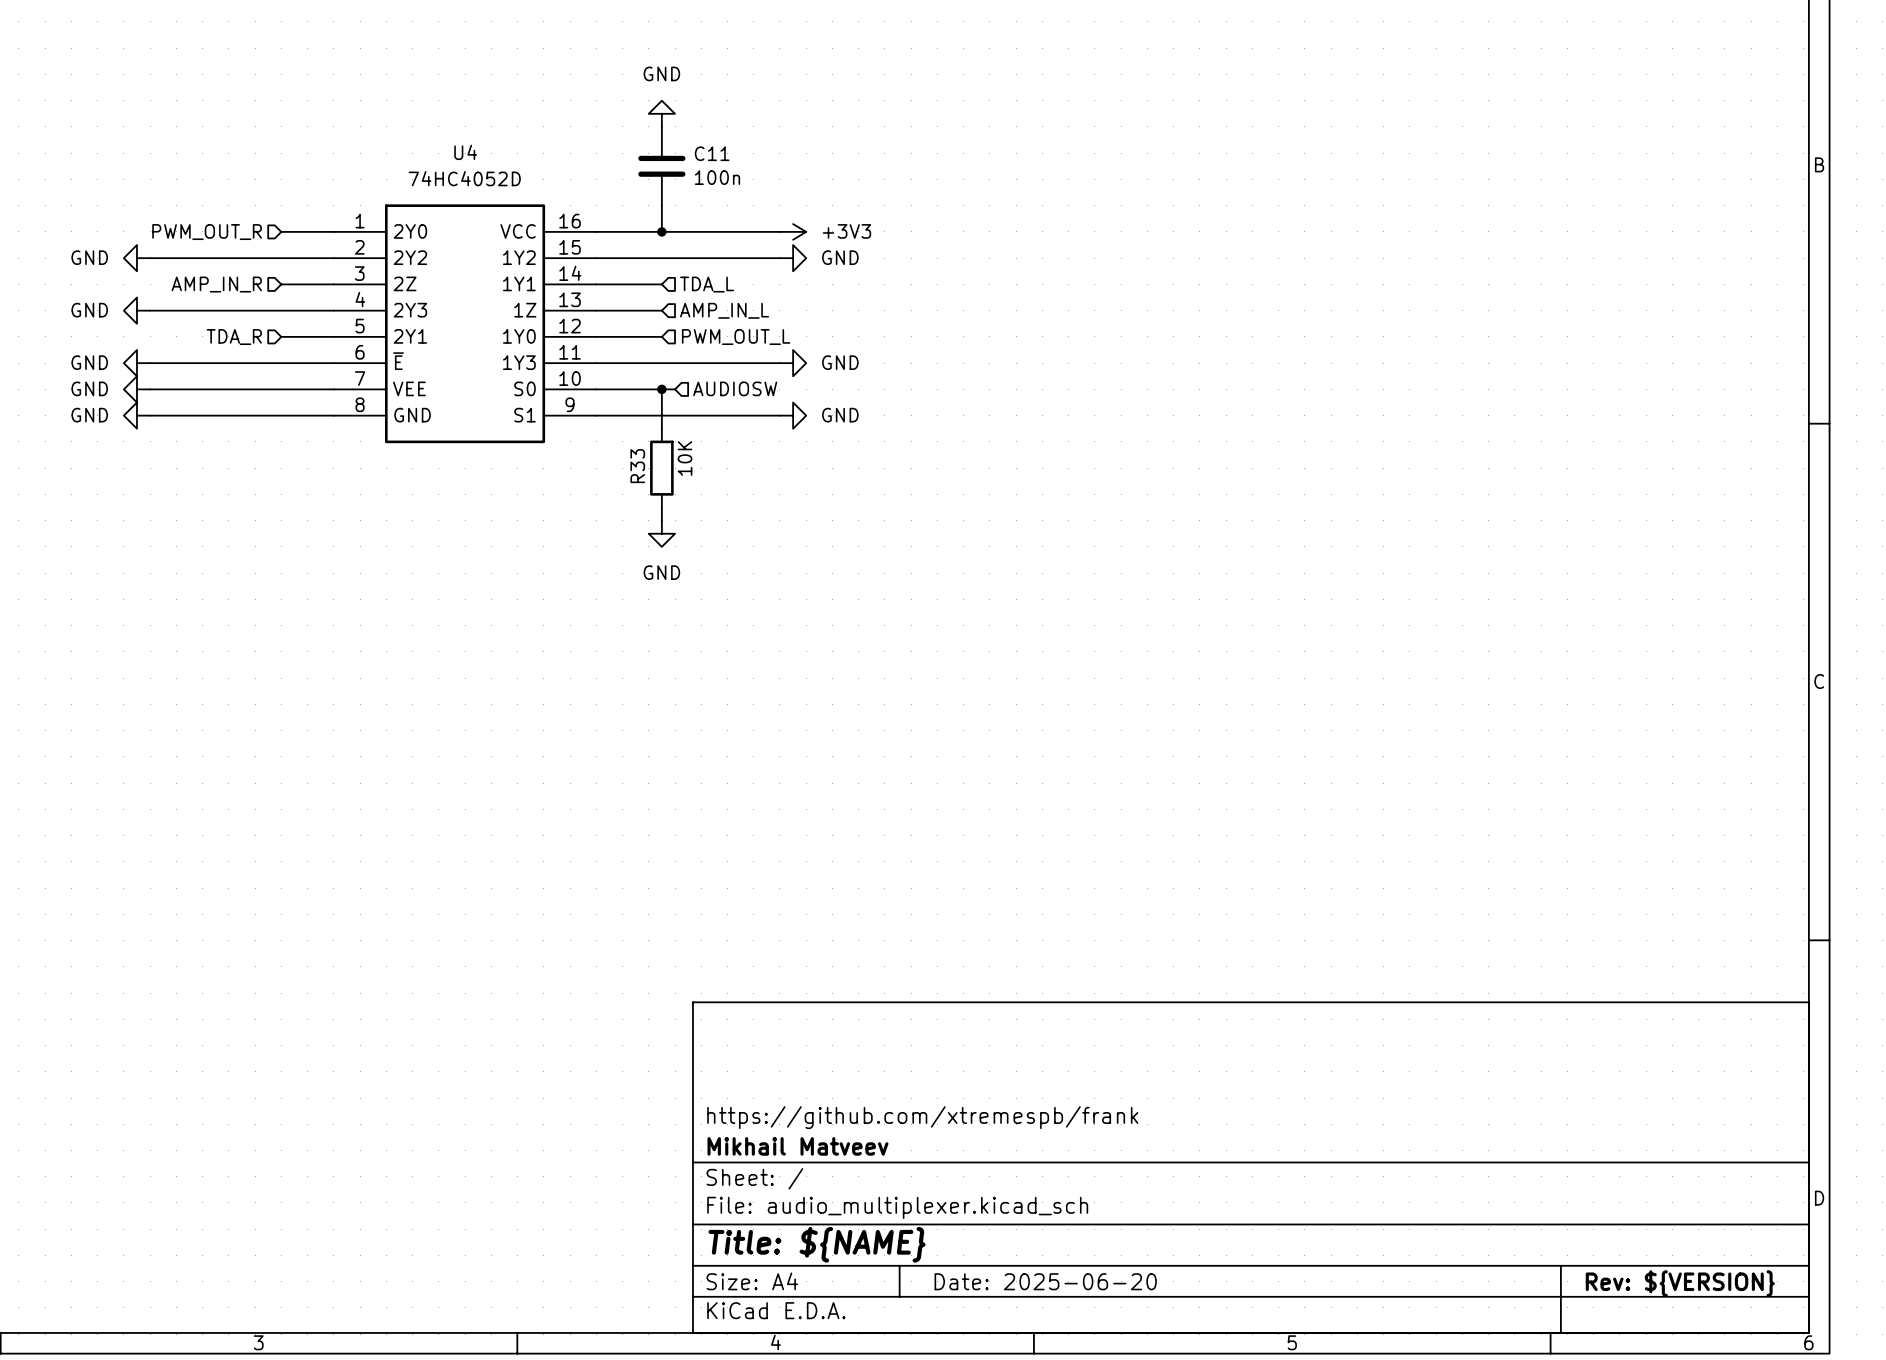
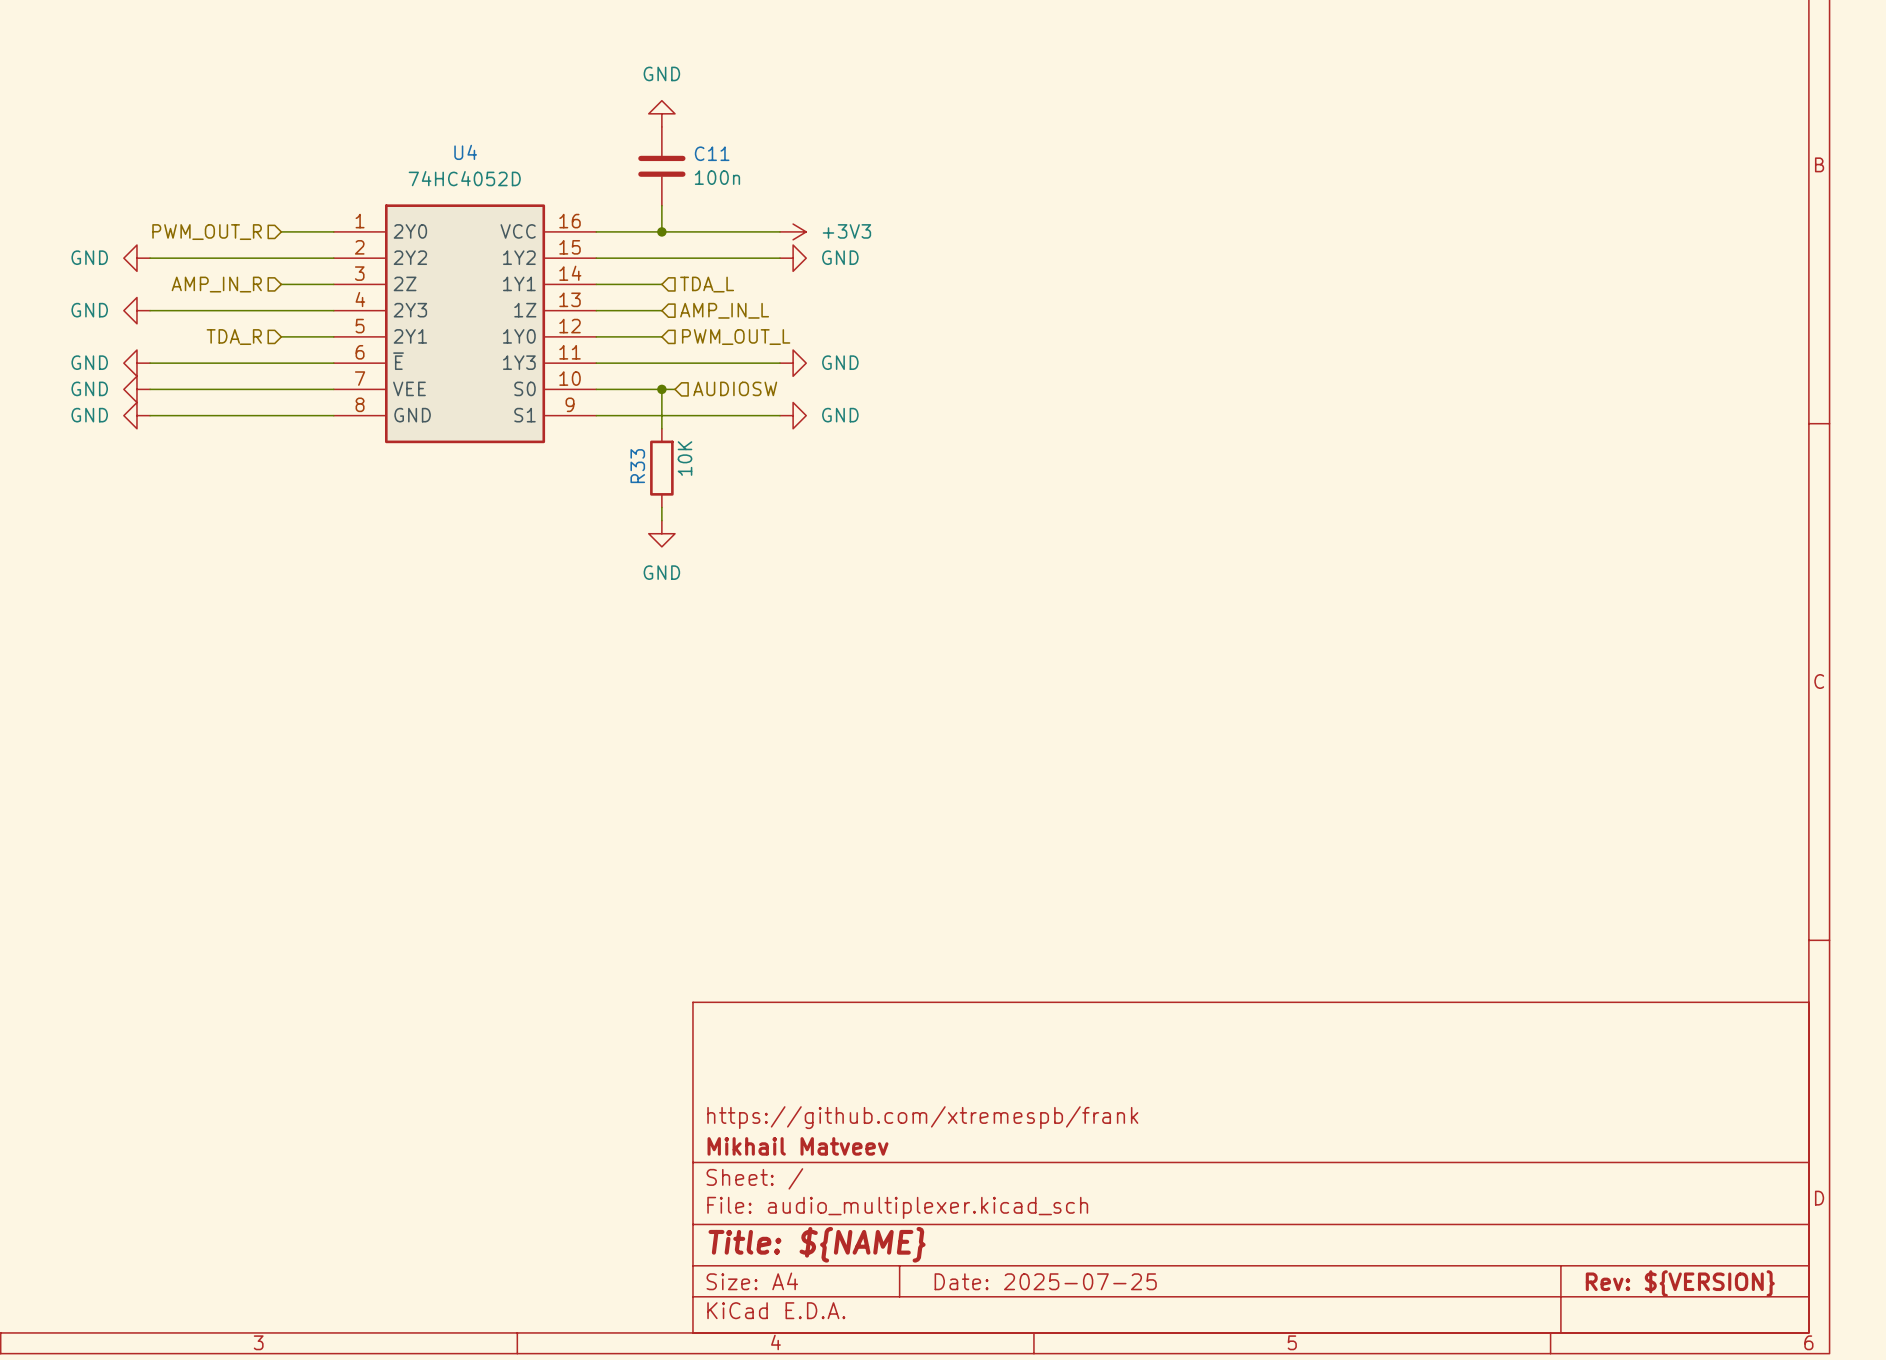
title block: Date: 2025-06-20 (1045, 1281) -> Date: 2025-07-25 (1045, 1281)

